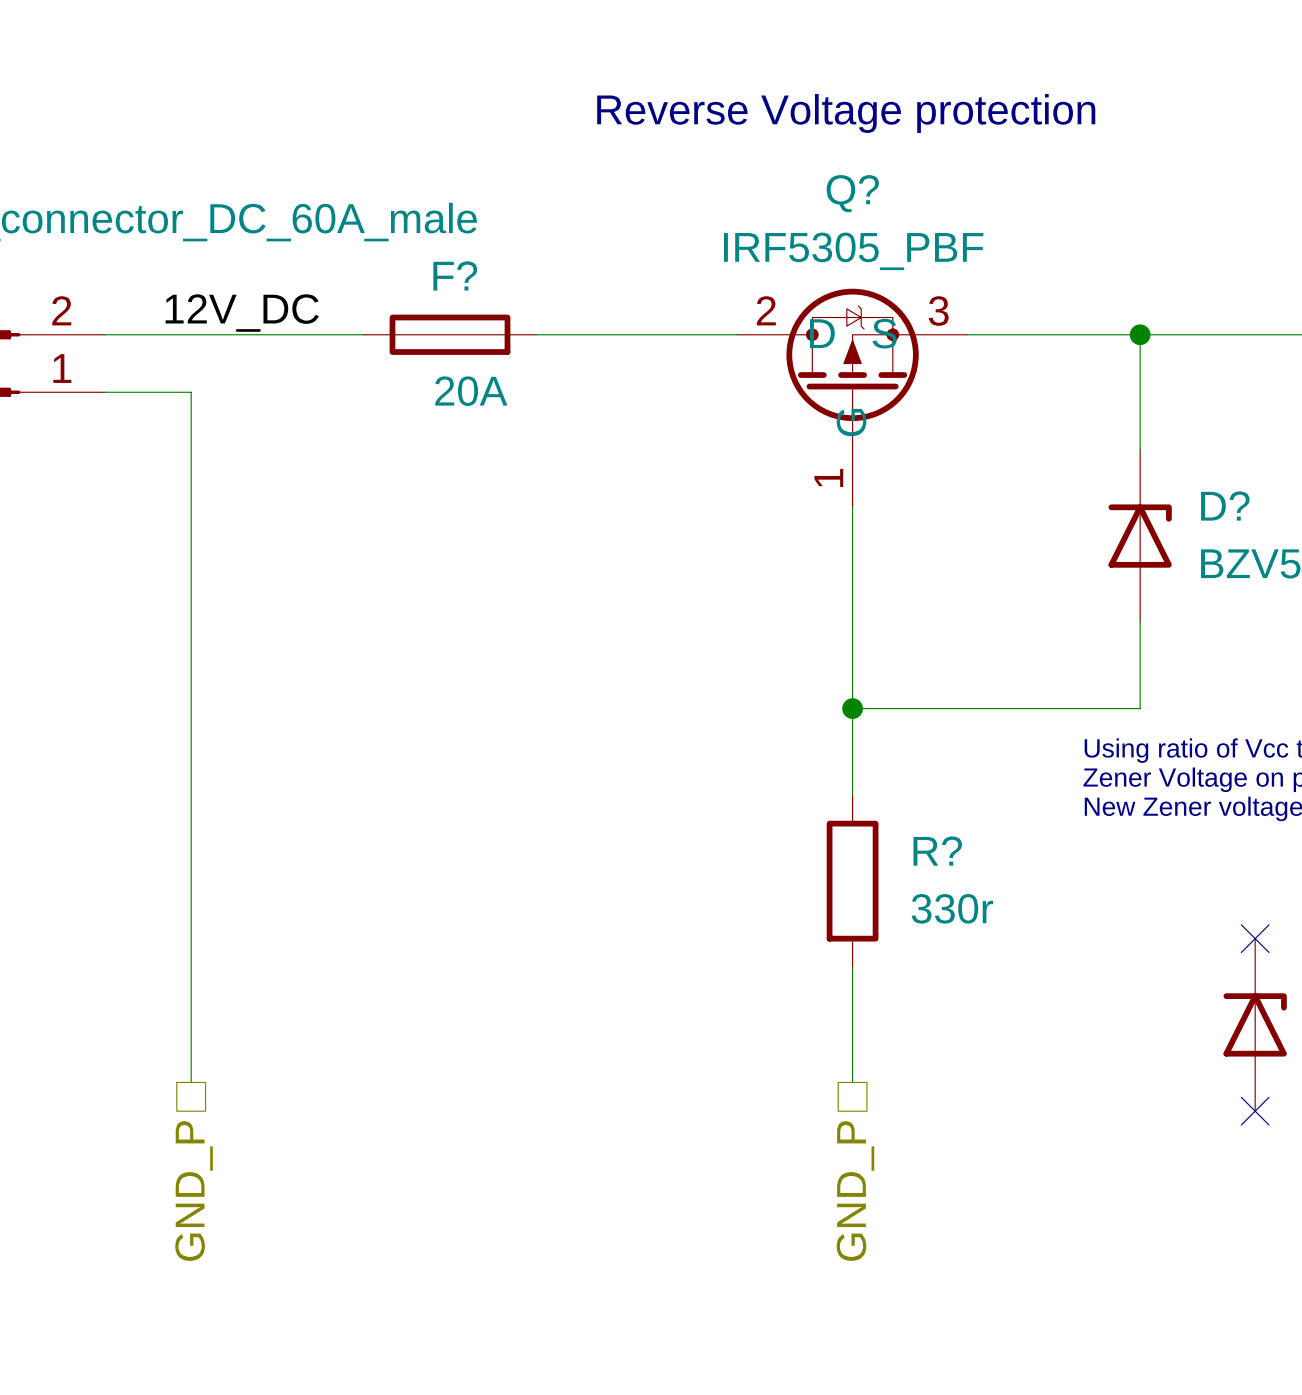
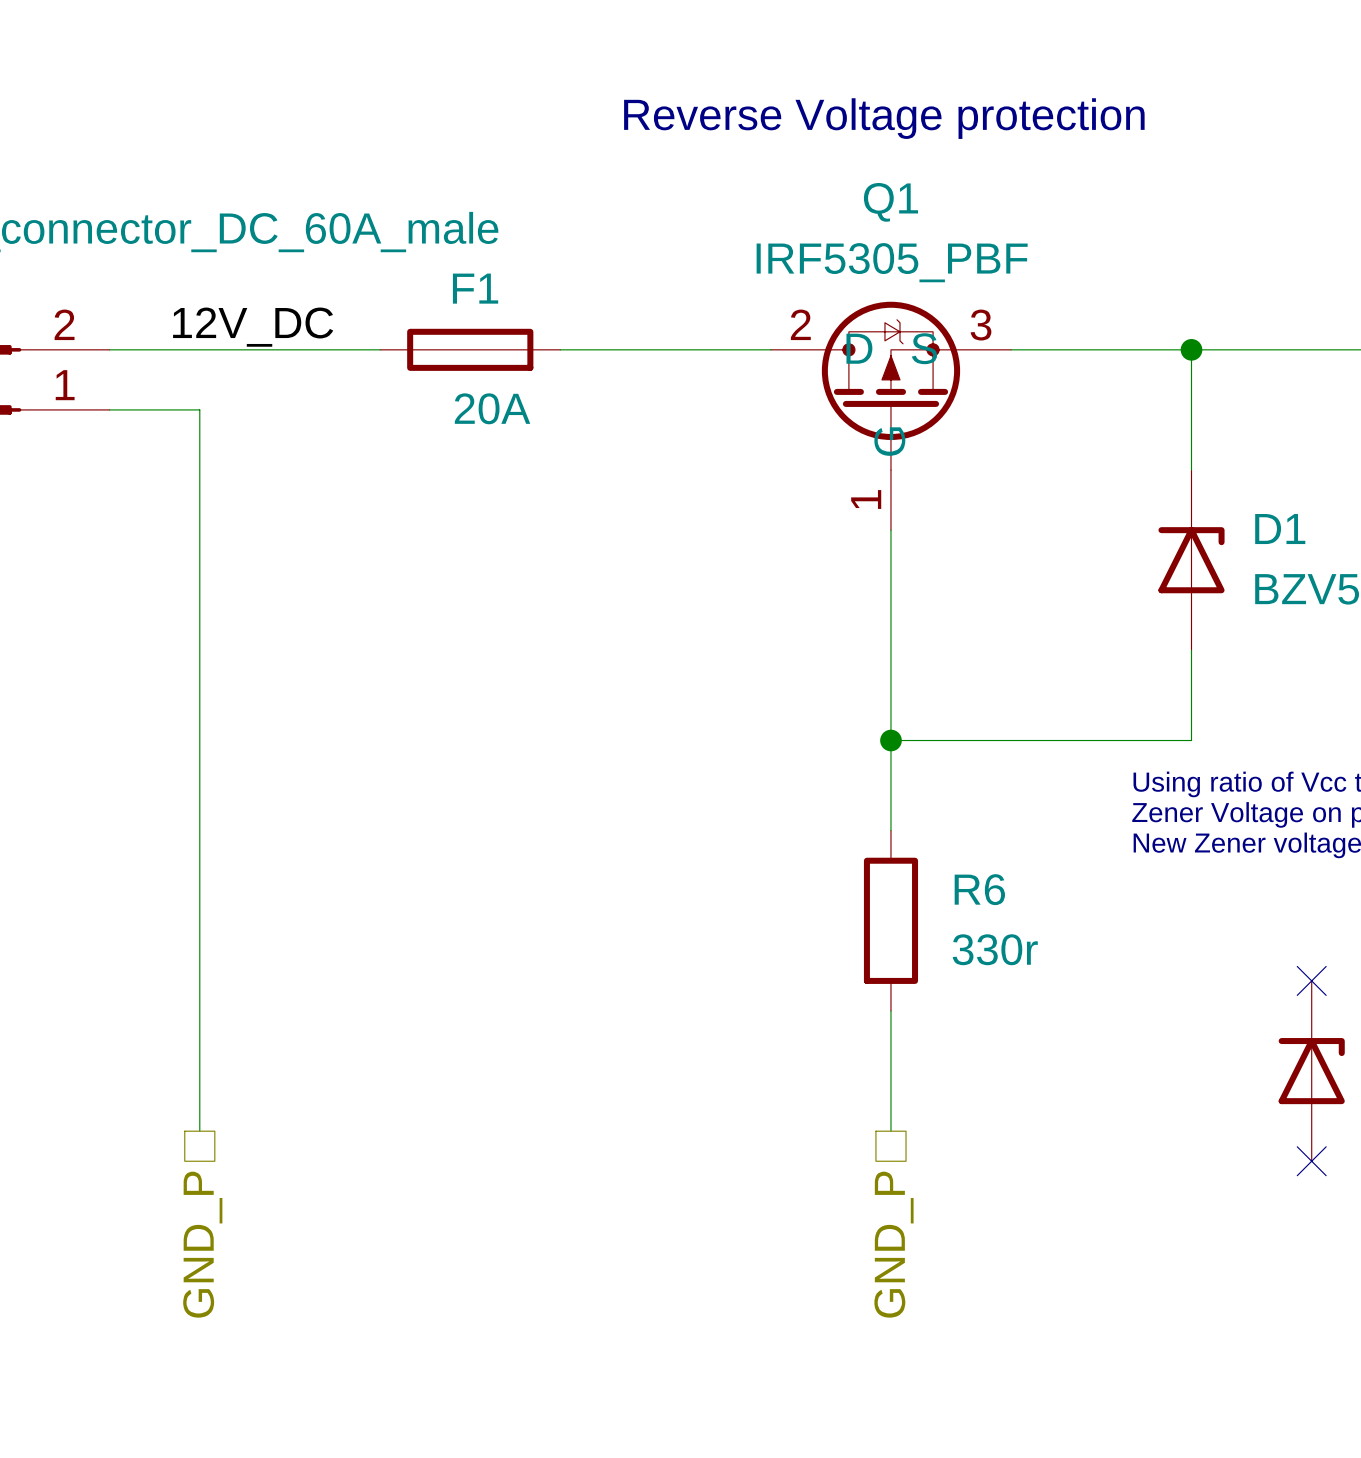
Q? name: Q? (852, 193) -> Q1 (890, 202)
F? name: F? (455, 275) -> F1 (475, 288)
D? name: D? (1225, 506) -> D1 (1280, 529)
R? name: R? (937, 851) -> R6 (979, 889)

